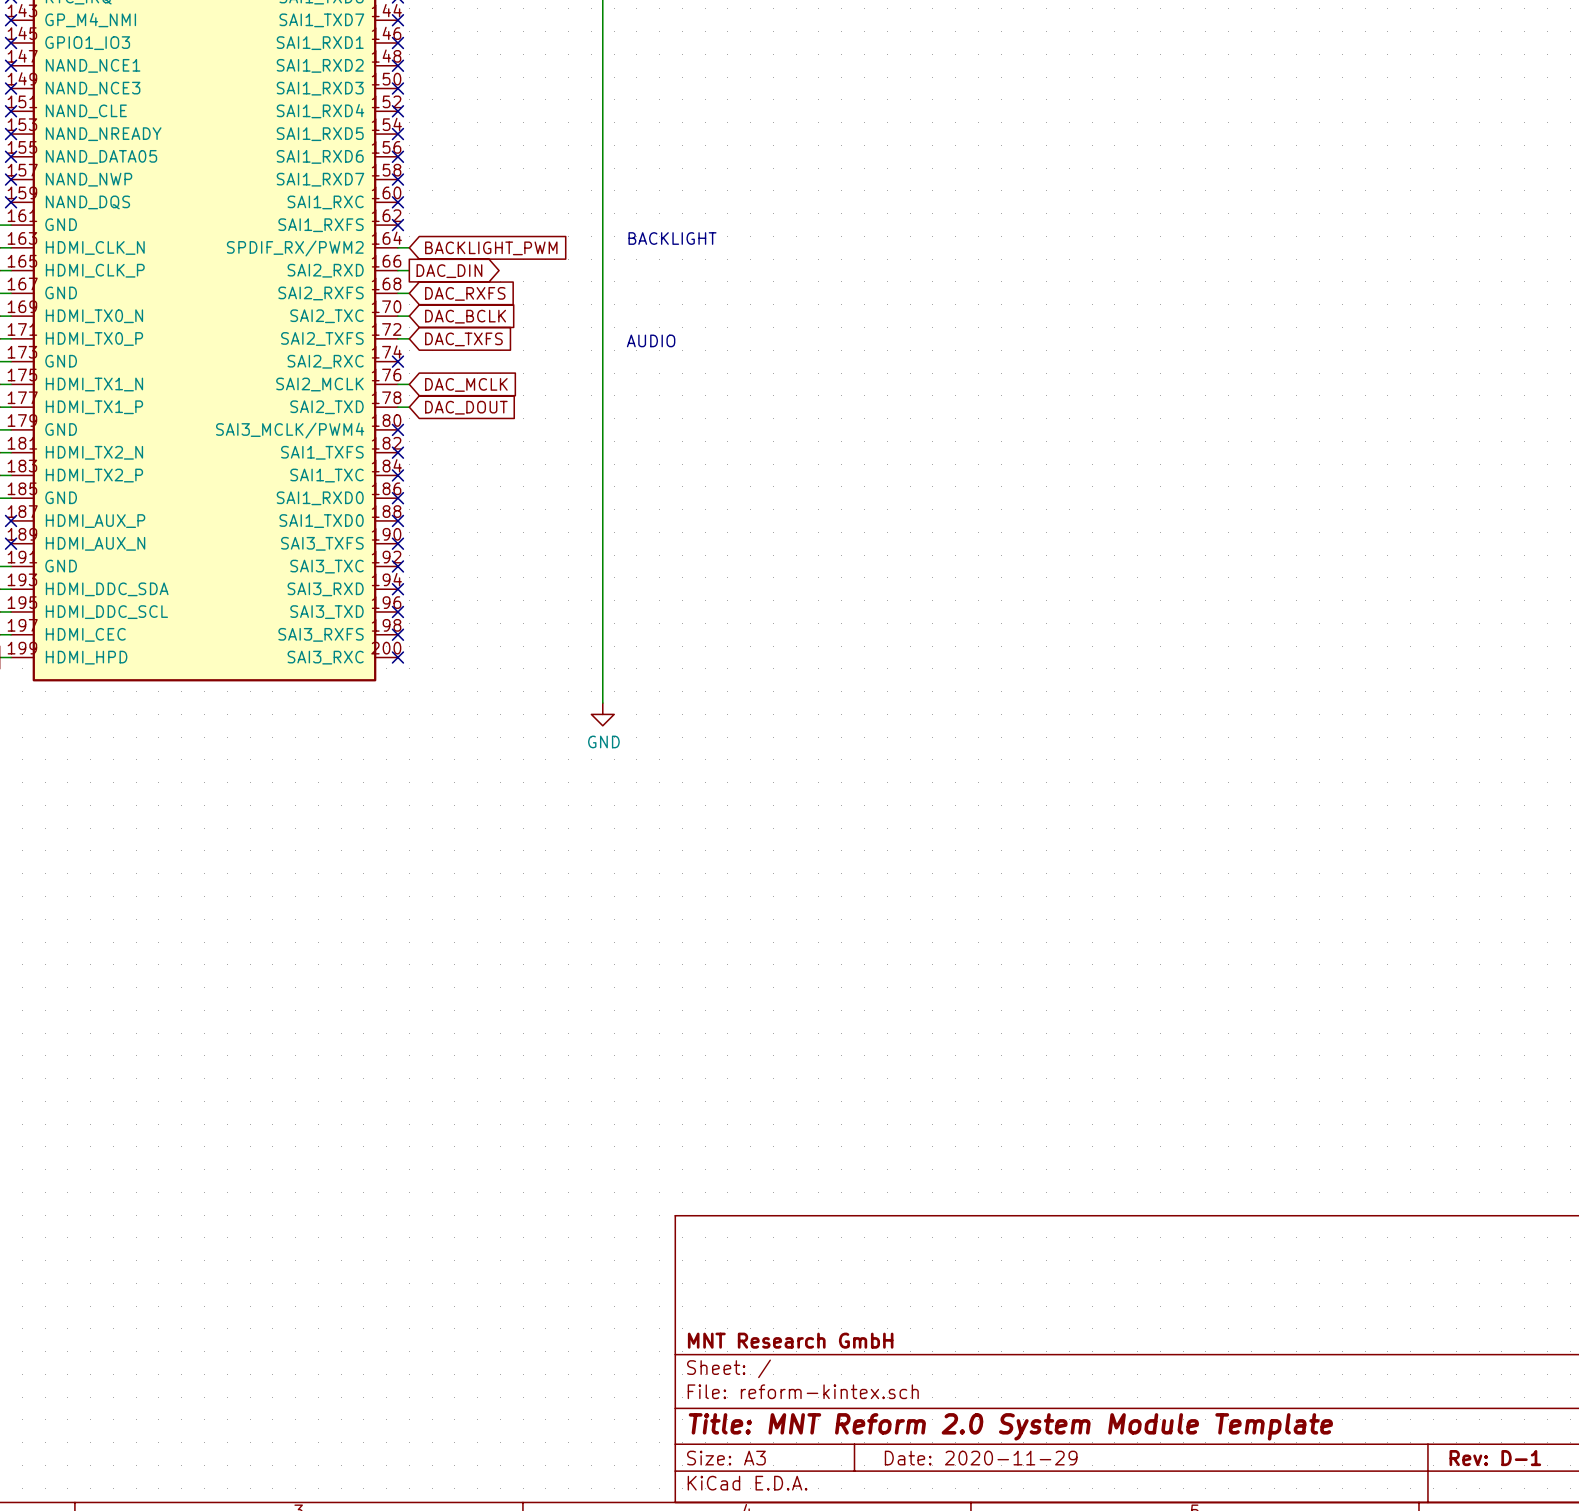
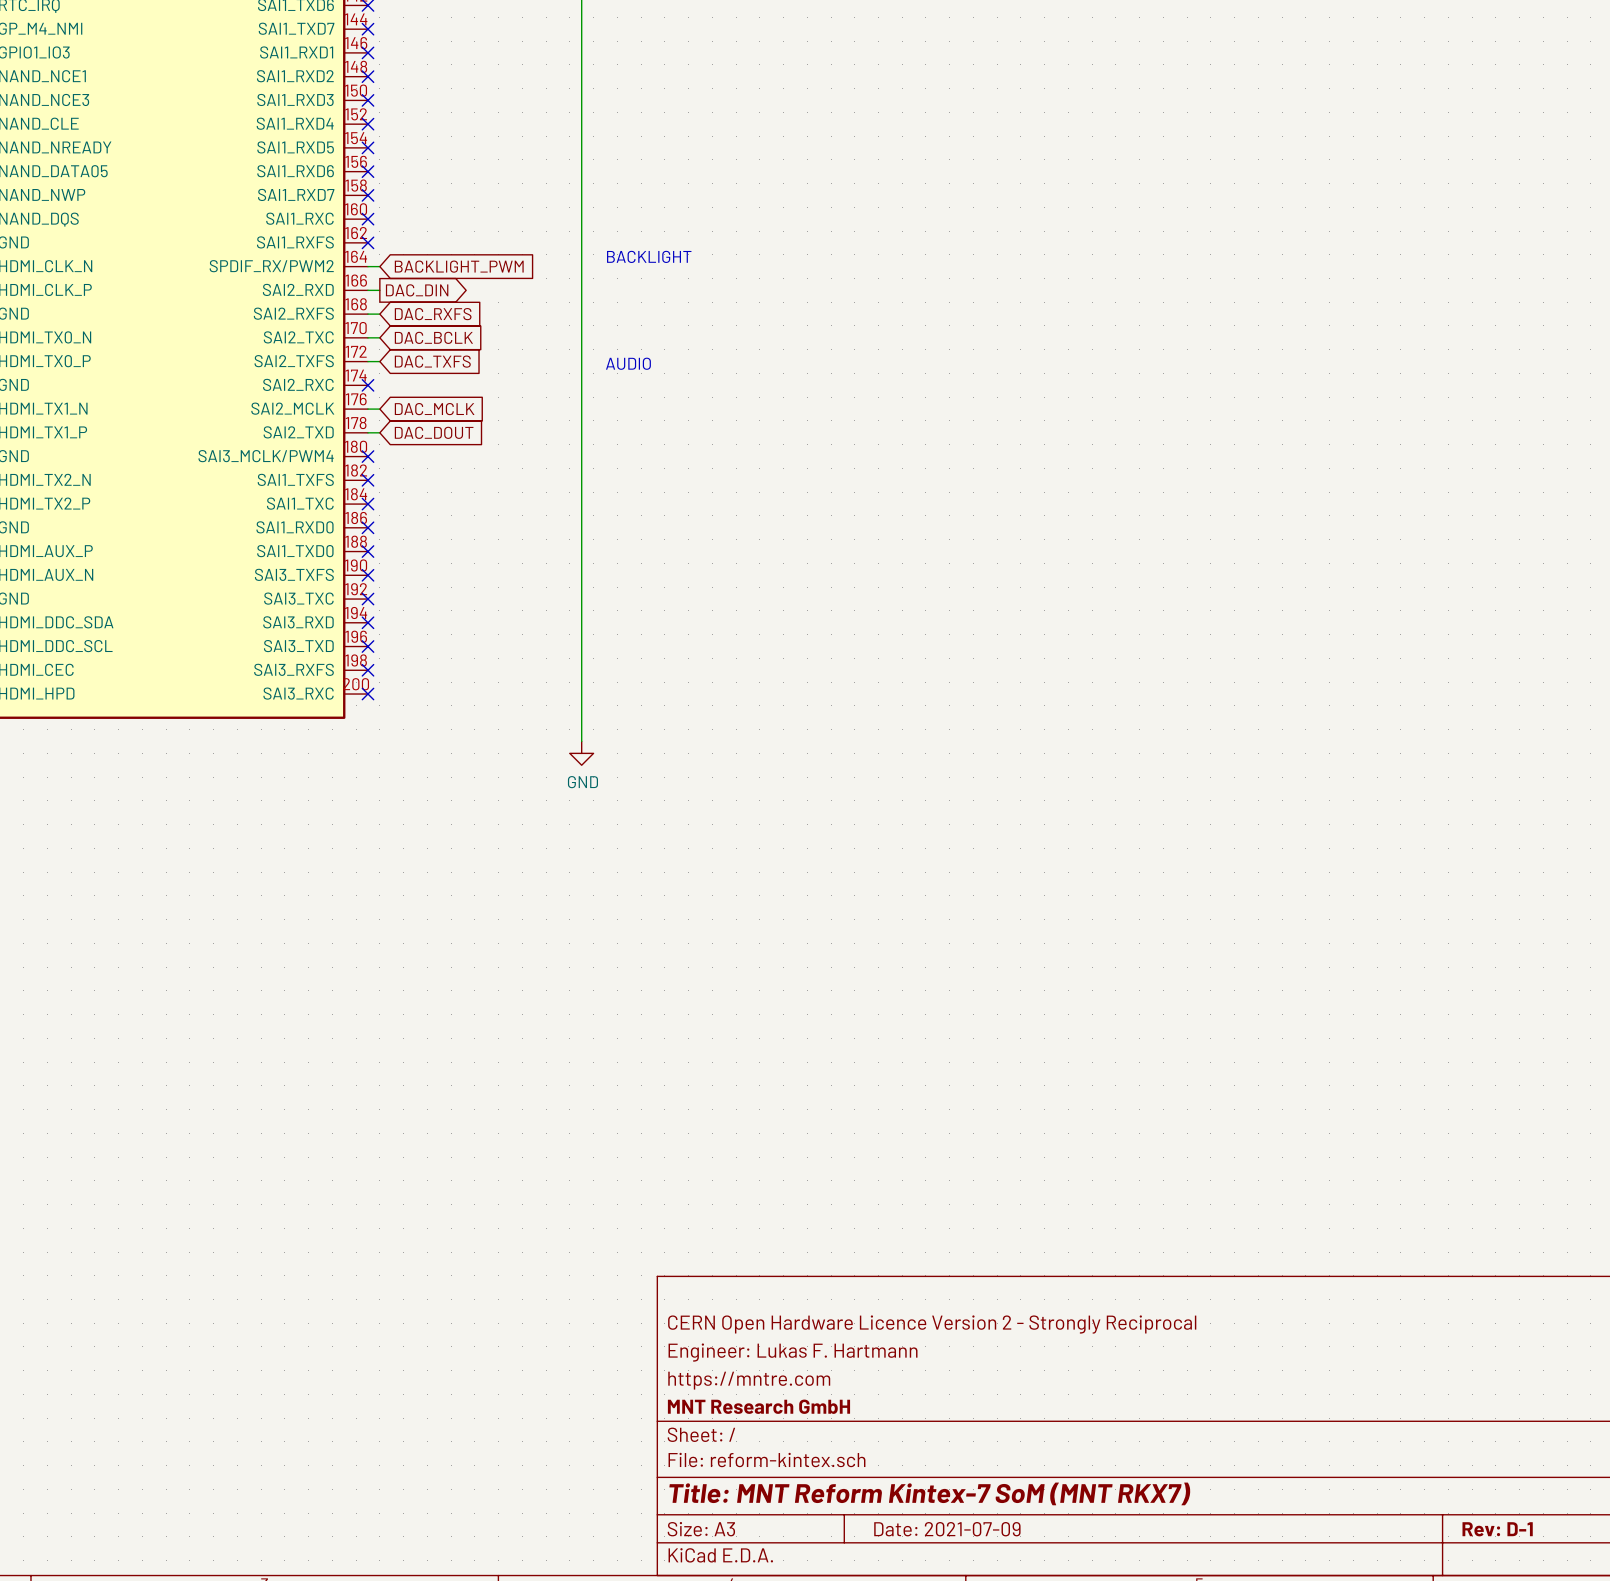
title block: none -> CERN Open Hardware Licence Version 2 - Strongly Reciprocal (932, 1324)
title block: none -> Engineer: Lukas F. Hartmann (793, 1352)
title block: none -> https://mntre.com (749, 1380)
title block: Title: MNT Reform 2.0 System Module Template (1010, 1426) -> Title: MNT Reform Kintex-7 SoM (MNT RKX7) (929, 1493)
title block: Date: 2020-11-29 (981, 1458) -> Date: 2021-07-09 (947, 1529)

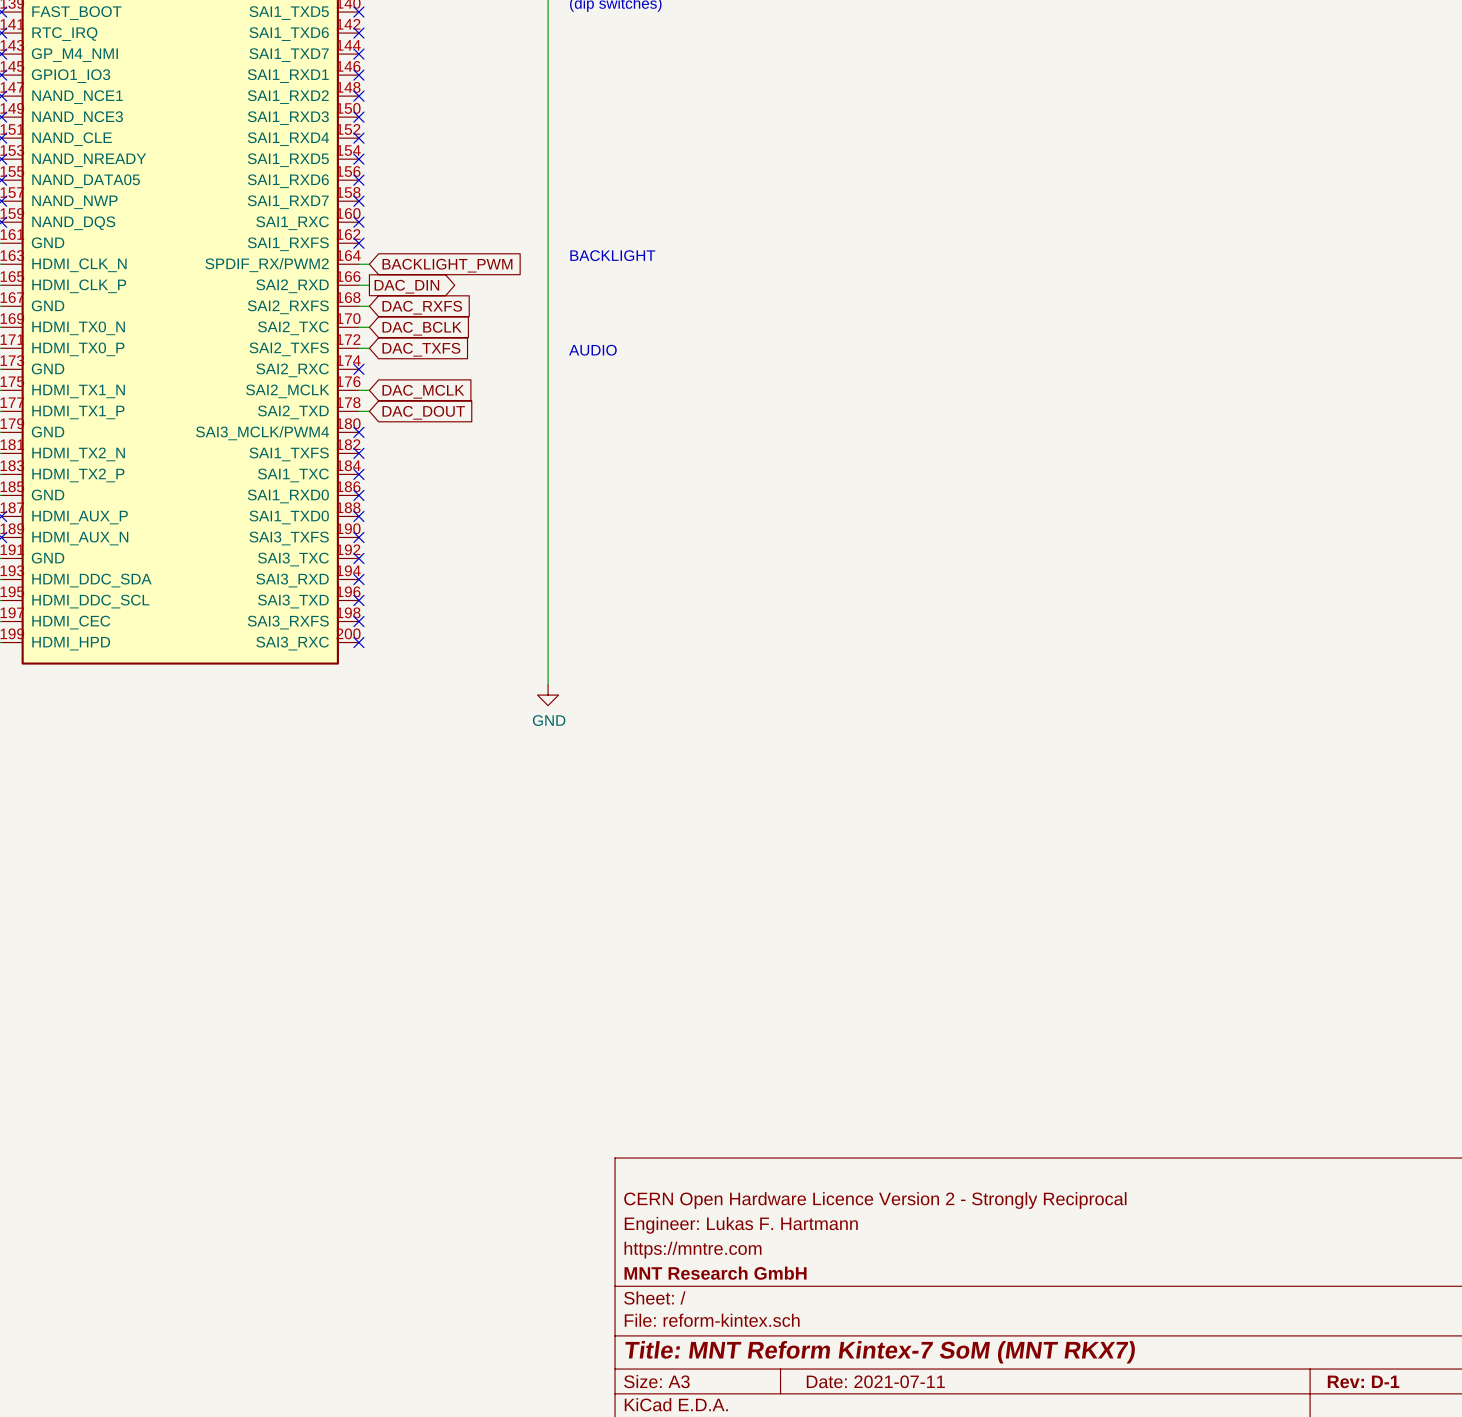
title block: Date: 2021-07-09 (947, 1529) -> Date: 2021-07-11 (875, 1381)

